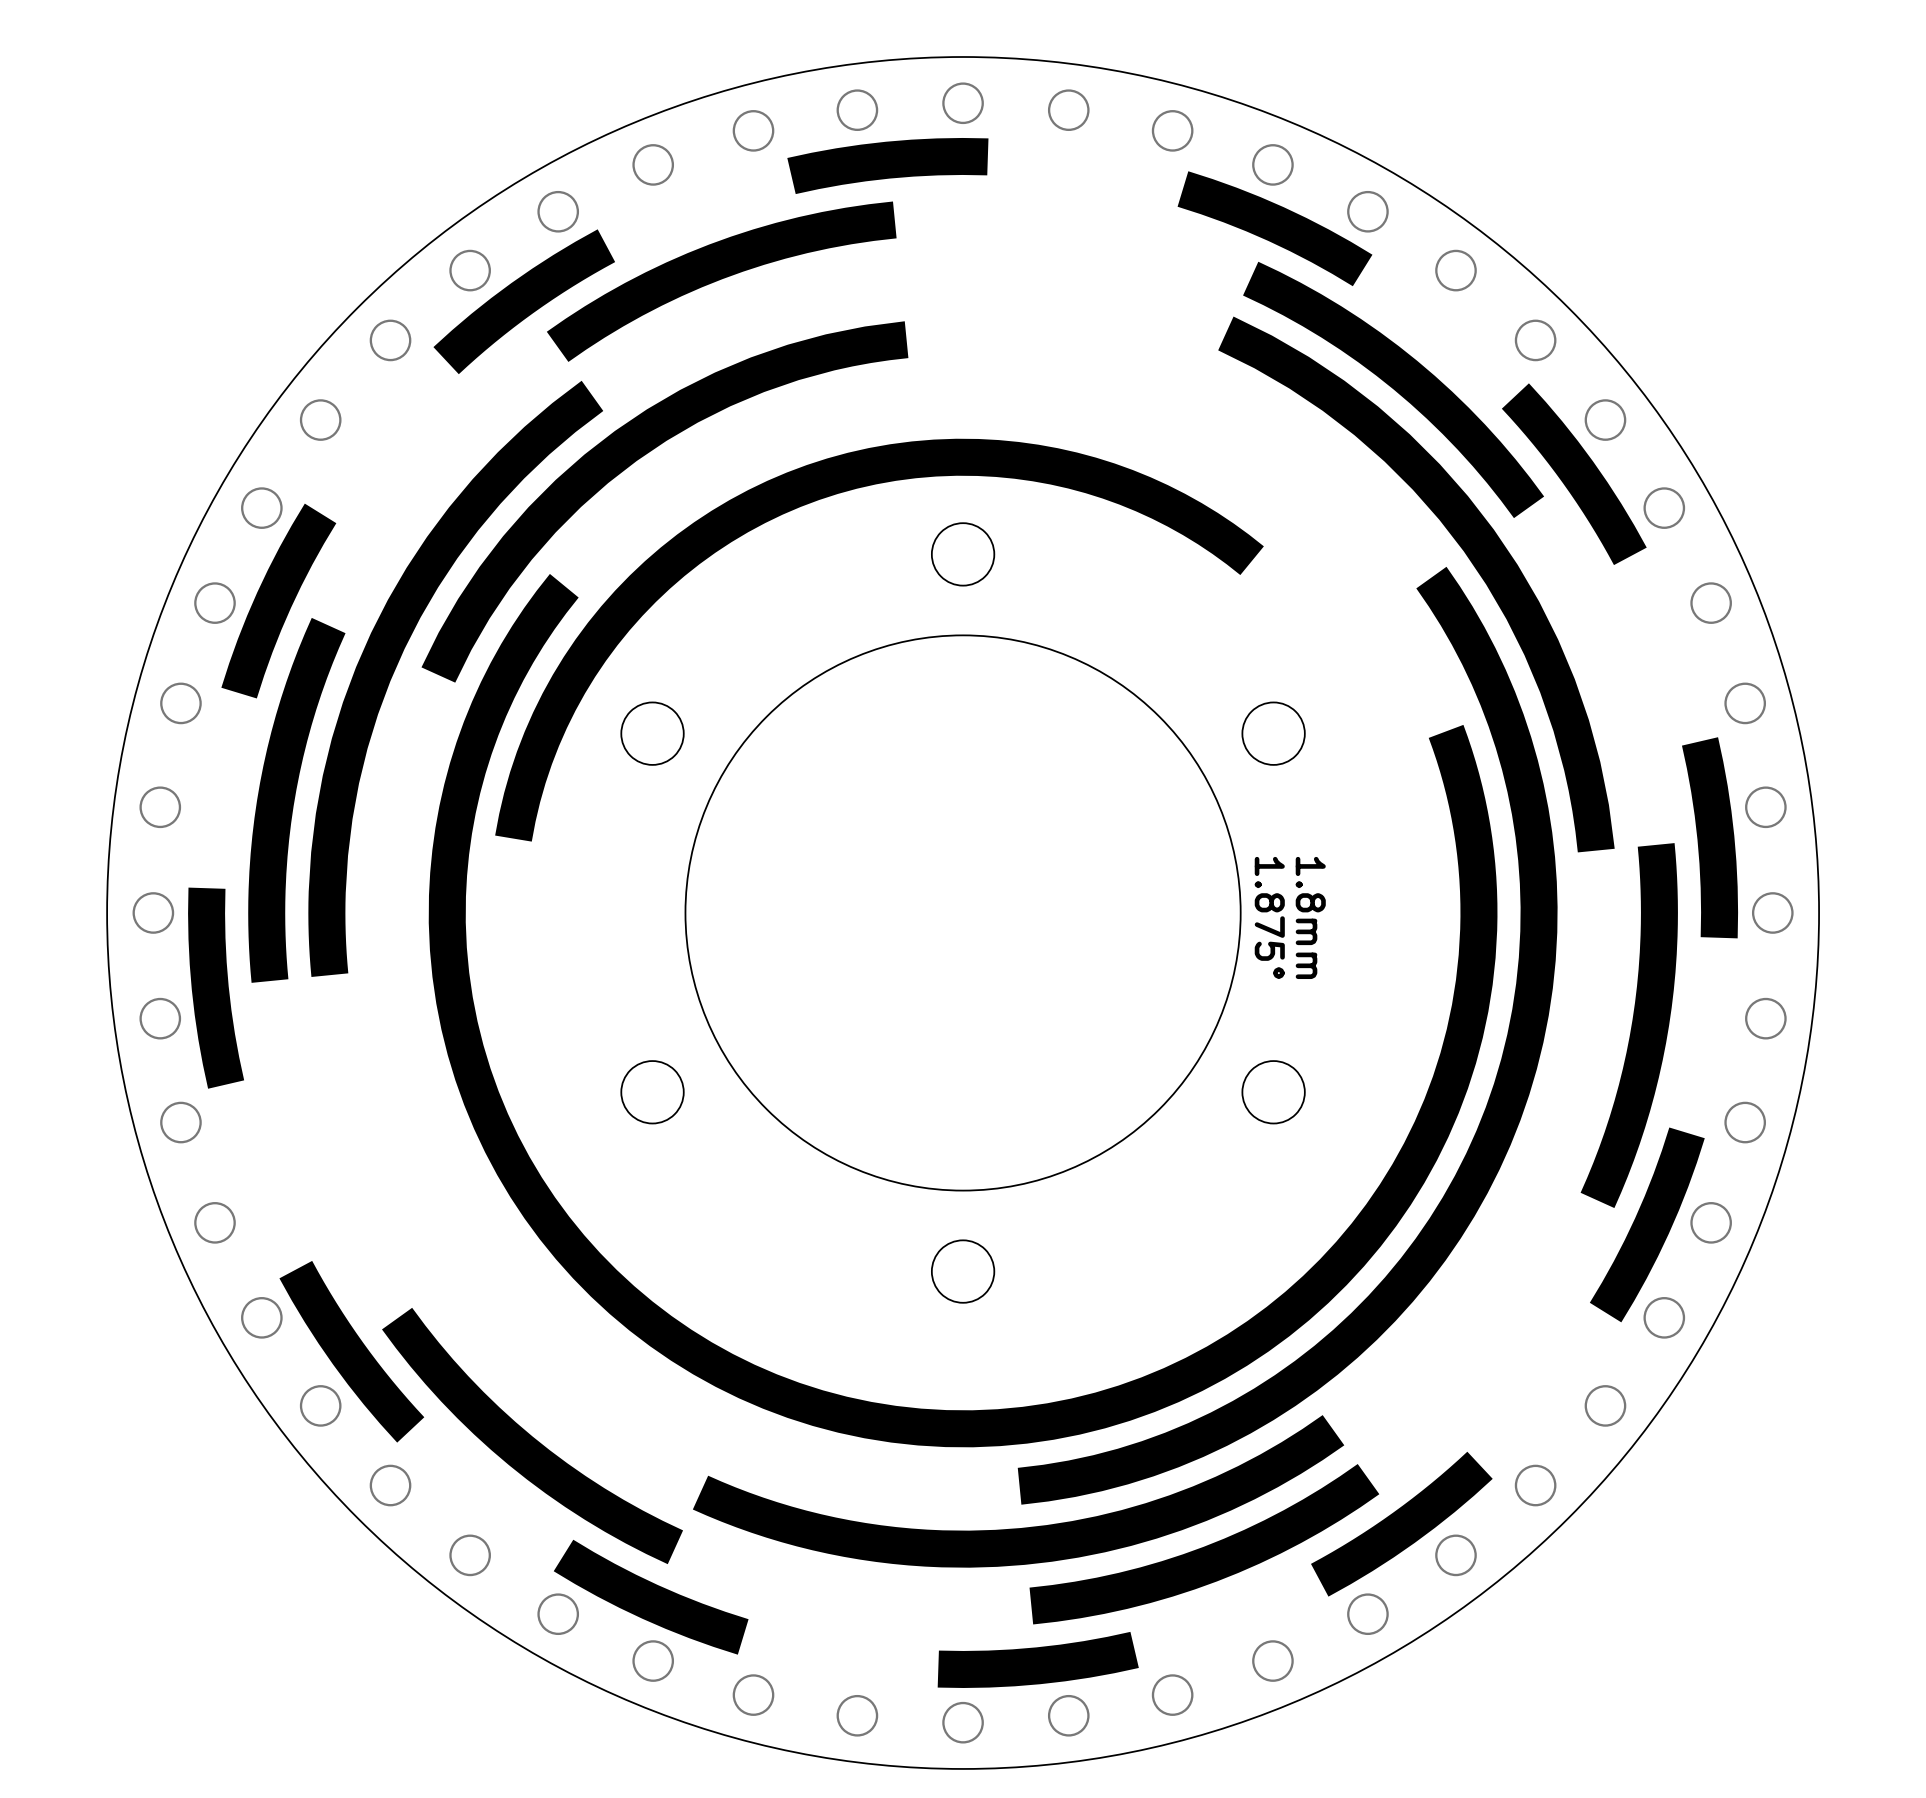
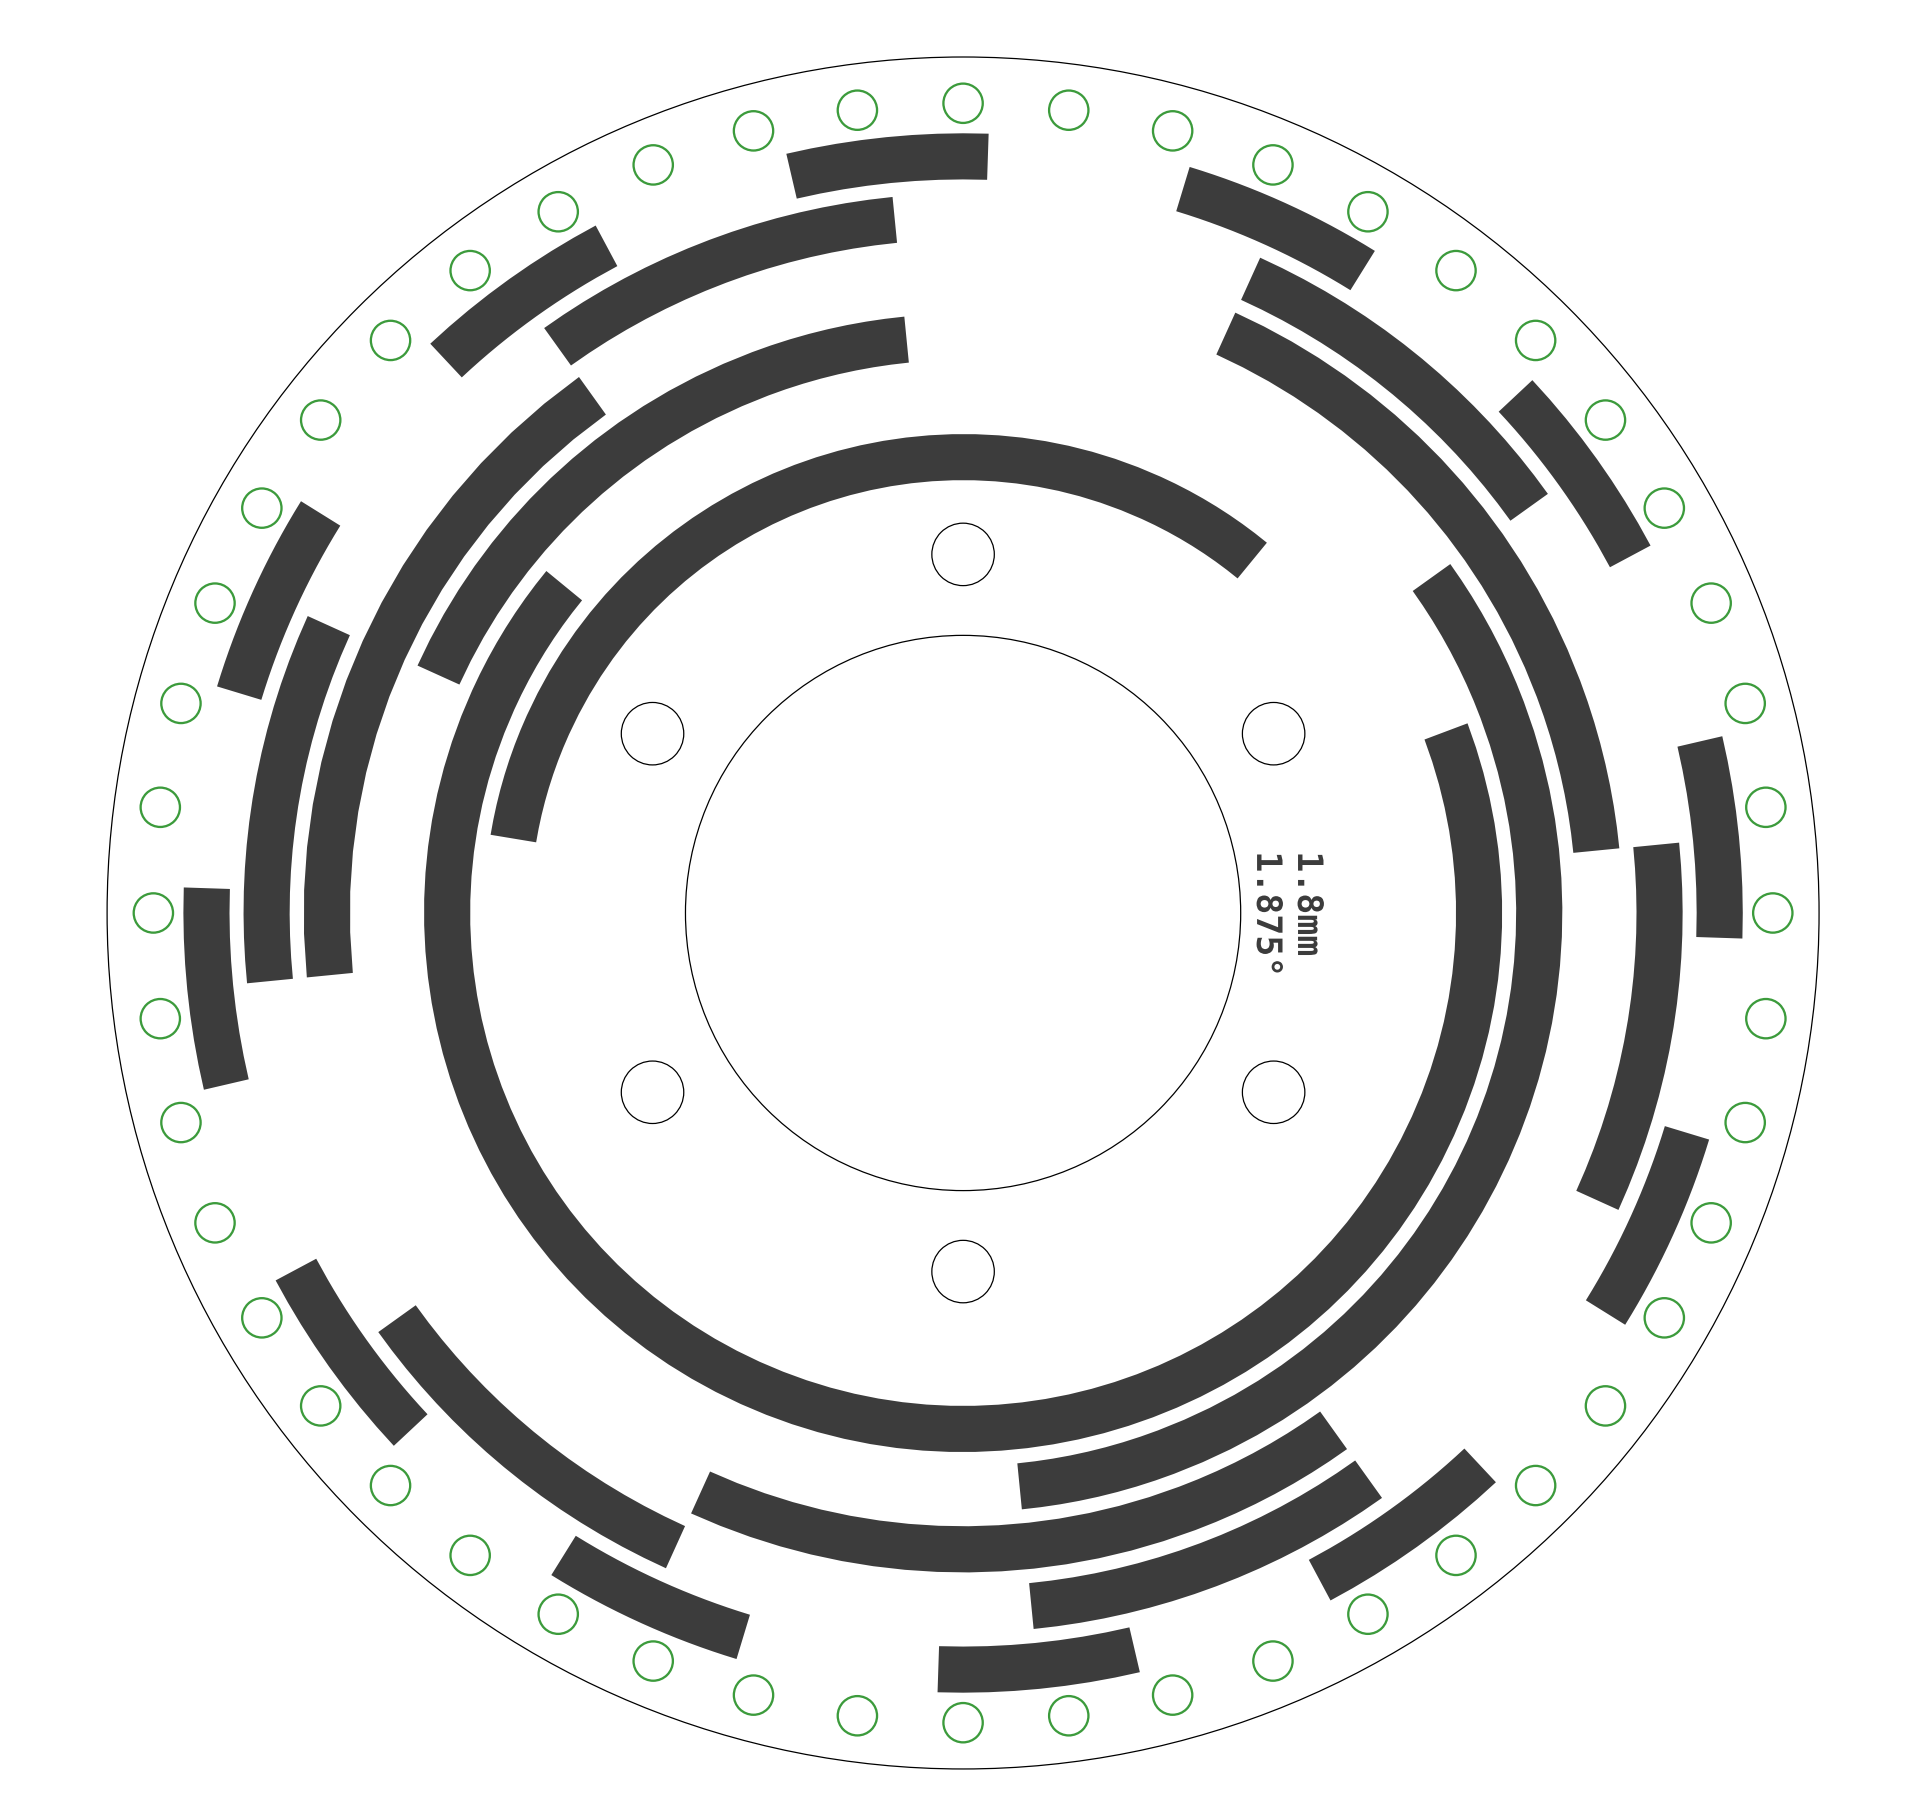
drawing shape: [188, 137, 1739, 1689] -> [183, 133, 1743, 1693]

